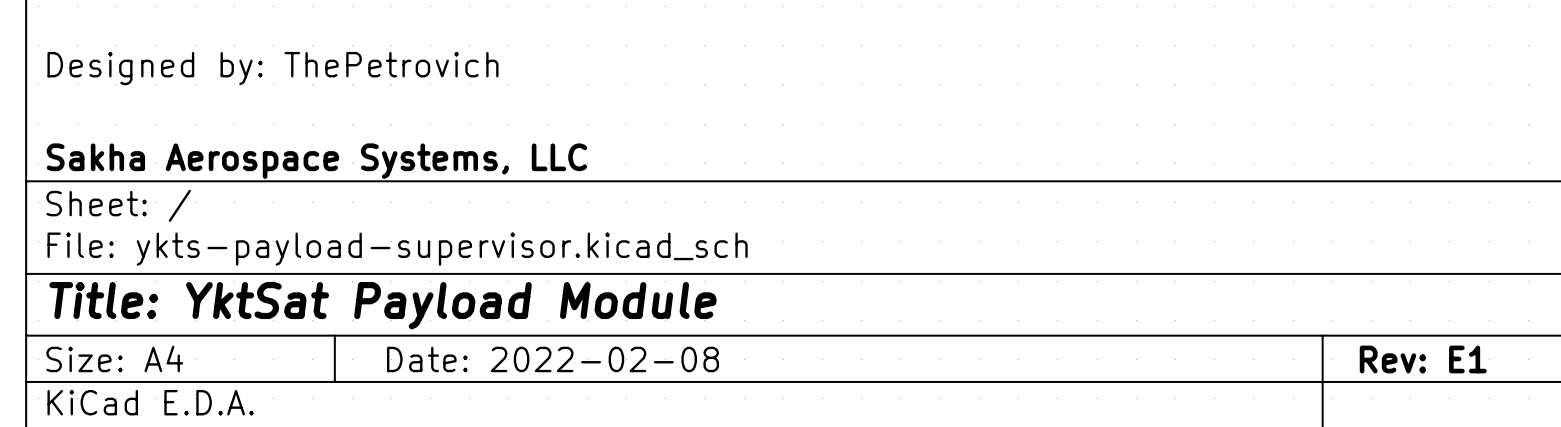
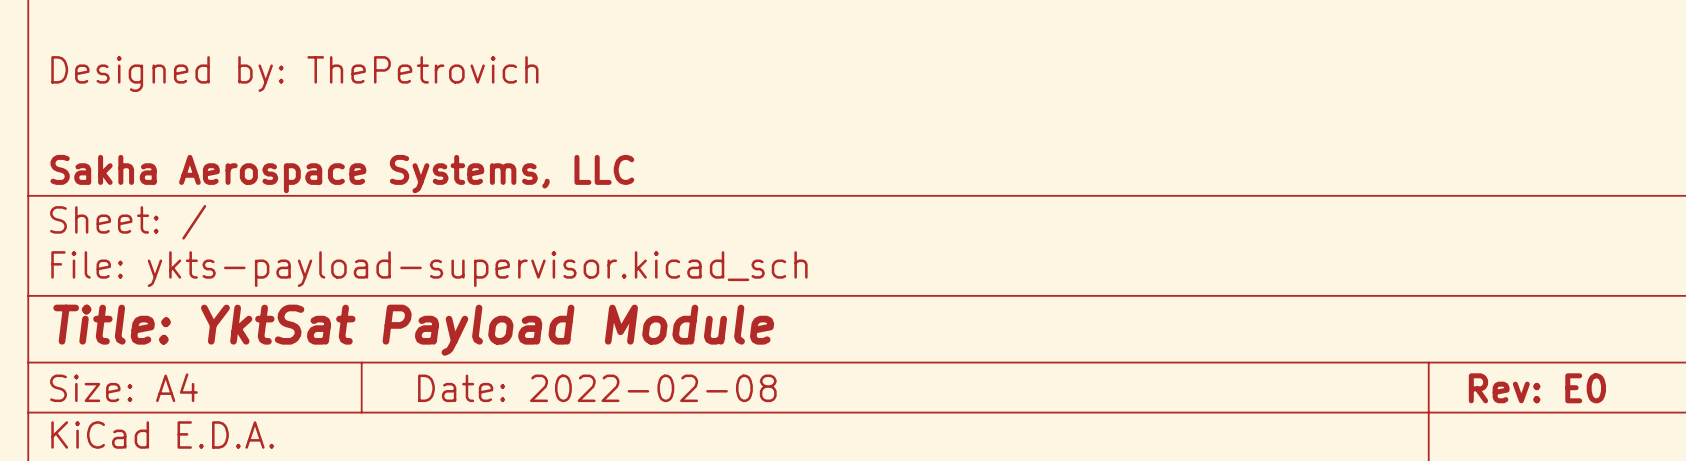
title block: Rev: E1 (1423, 359) -> Rev: E0 (1537, 388)

